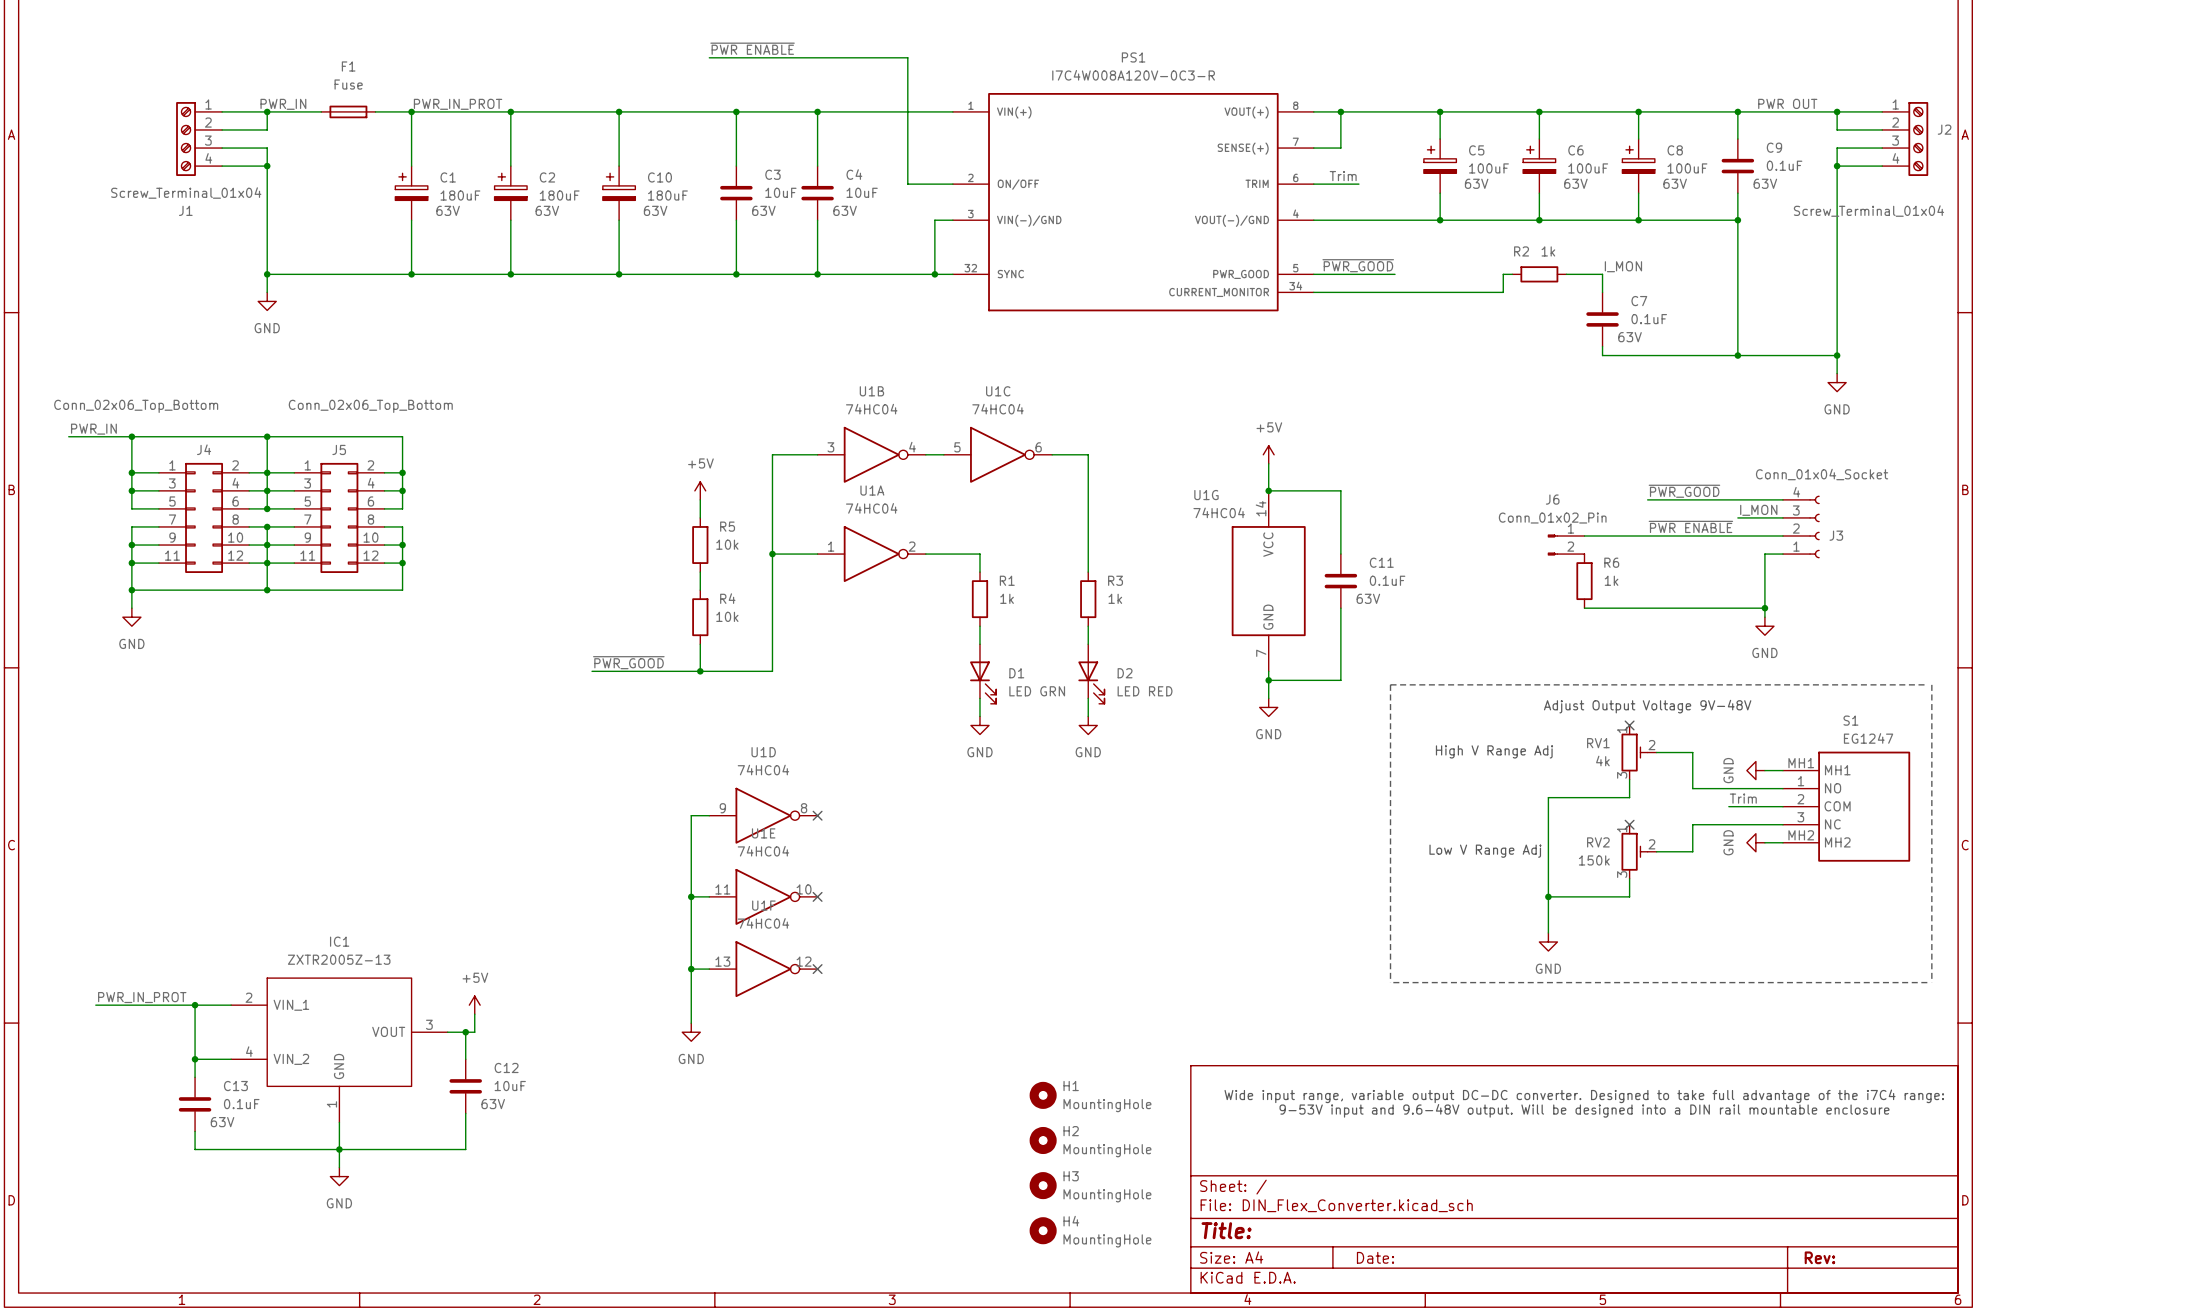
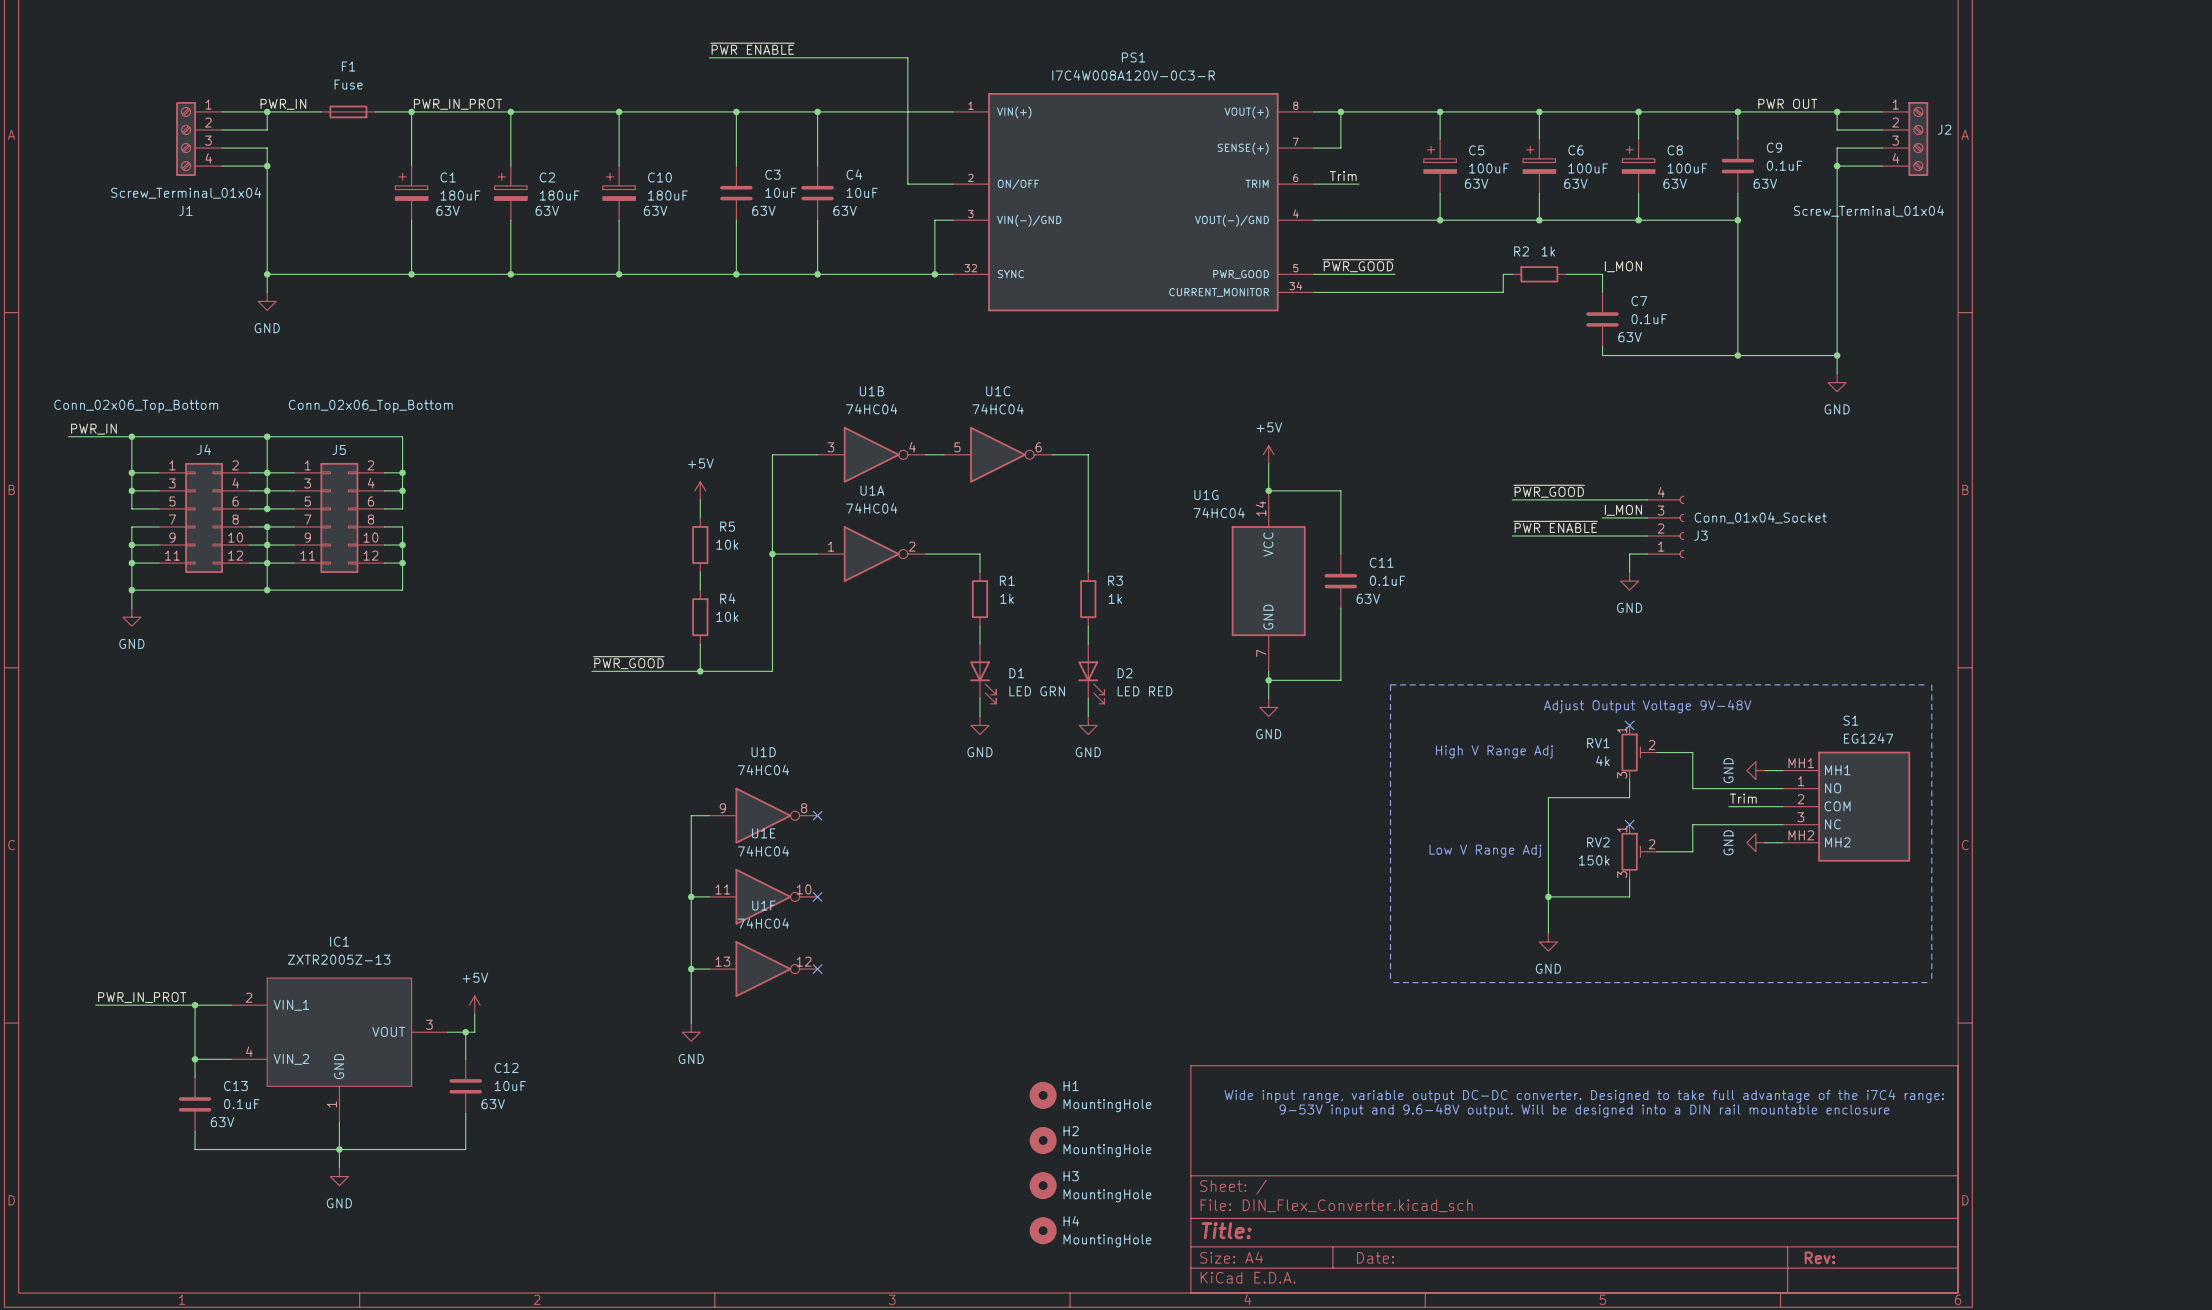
J3 value position: Conn_01x04_Socket (1822, 474) -> Conn_01x04_Socket (1760, 517)
label position: ~{PWR_GOOD} (1684, 491) -> ~{PWR_GOOD} (1549, 491)
wire: (1647, 499) (1782, 499) -> (1647, 499) (1512, 499)
label position: I_MON (1758, 510) -> I_MON (1623, 510)
wire: (1737, 517) (1782, 517) -> (1602, 517) (1647, 517)
label position: ~{PWR ENABLE} (1690, 526) -> ~{PWR ENABLE} (1555, 526)
J3 position: (1801, 526) -> (1665, 526)
wire: none -> (1512, 535) (1584, 535)
wire: (1647, 535) (1782, 535) -> none
J6: Conn_01x02_Pin (1566, 545) -> none
wire: none -> (1647, 554) (1629, 554) (1629, 572)
wire: (1782, 554) (1764, 554) (1764, 617) -> none
R6: 1k (1584, 581) -> none
wire: (1584, 608) (1764, 608) -> none
junction: (1764, 608) -> none
power symbol position: GND (1764, 626) -> GND (1629, 581)

